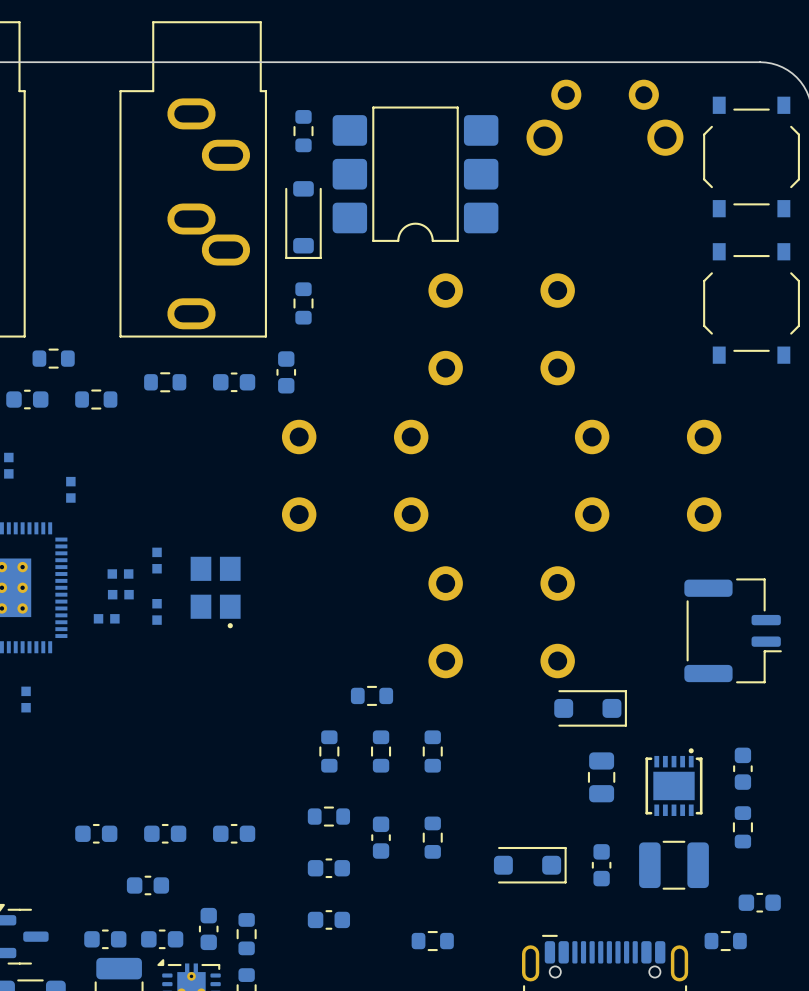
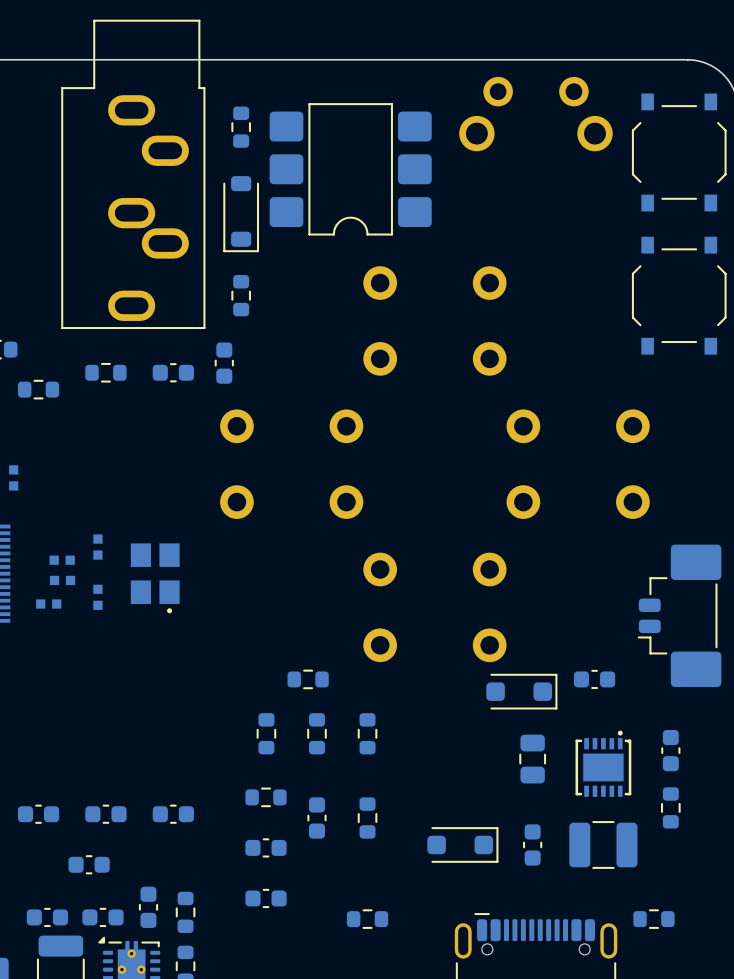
part: (733, 630) -> none
part: none -> (679, 615)
part position: (759, 902) -> (594, 679)

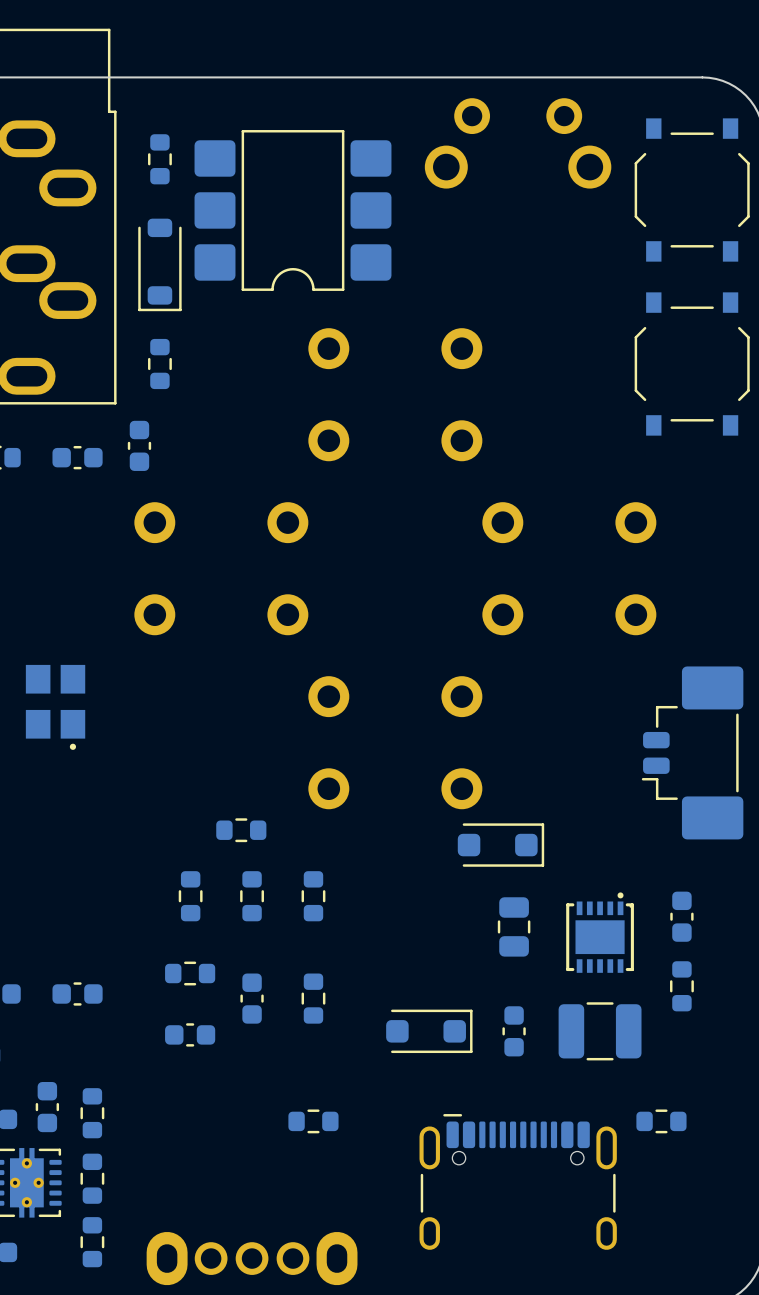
part: (594, 679) -> none
part: (266, 898) -> none

